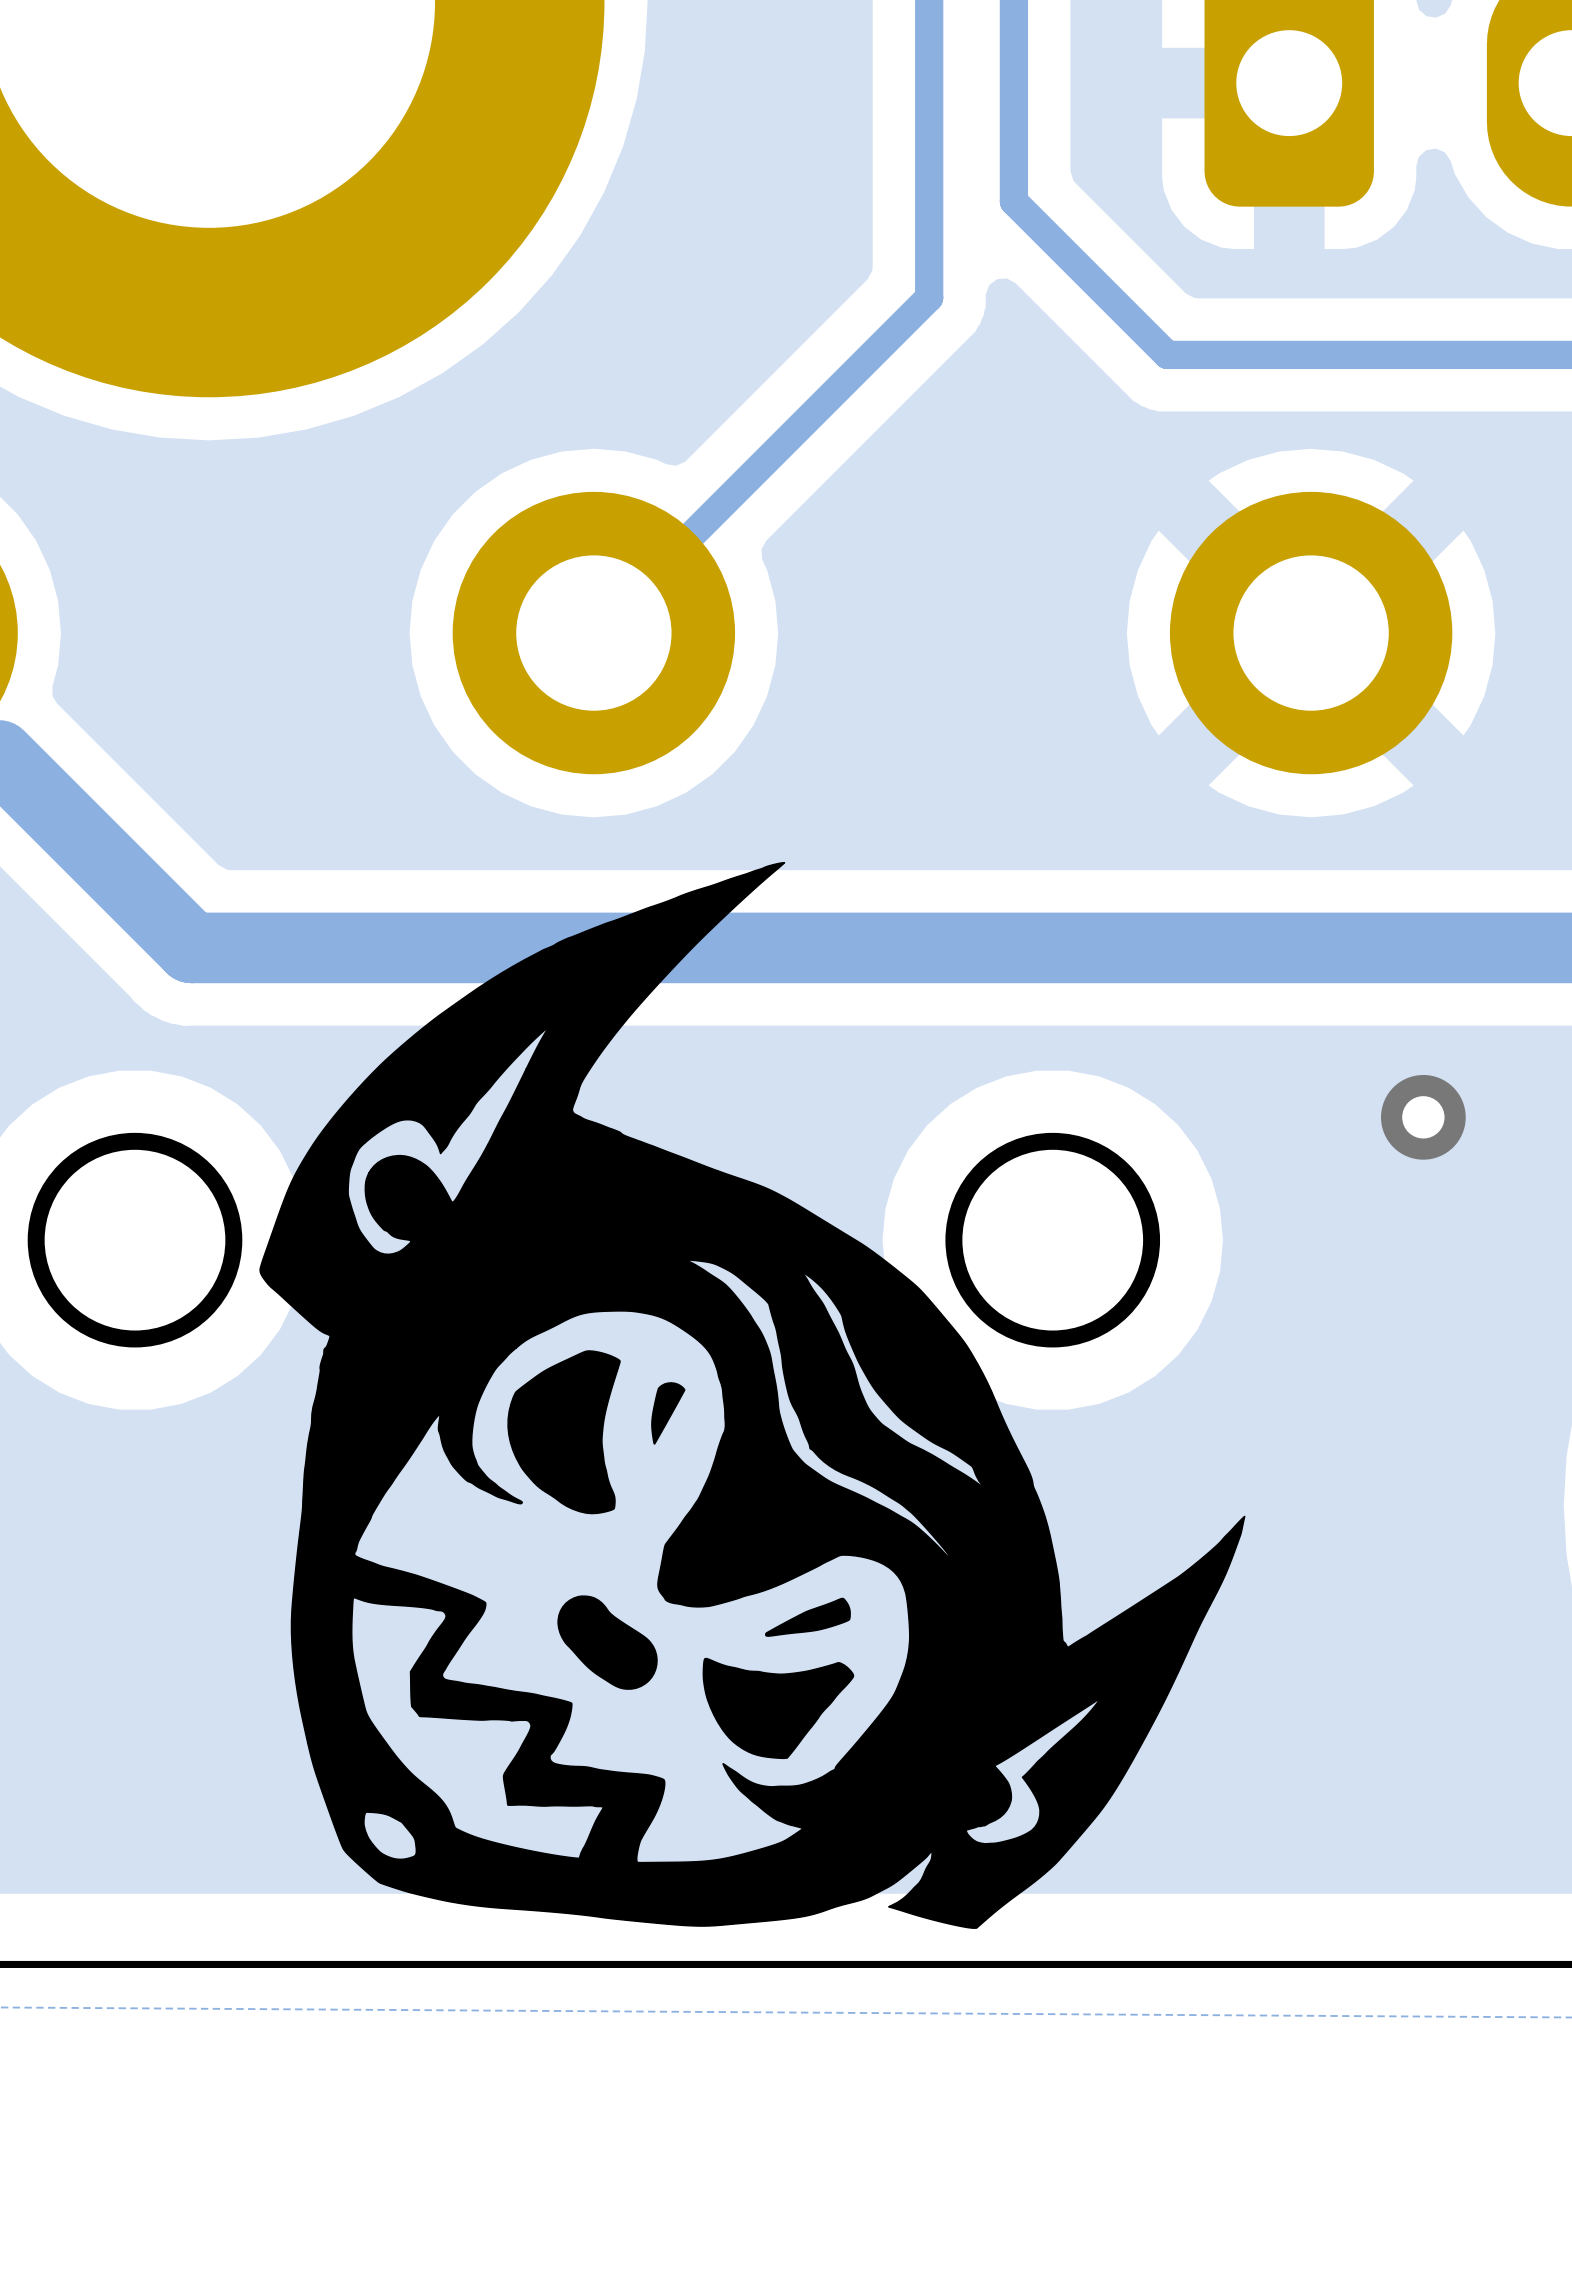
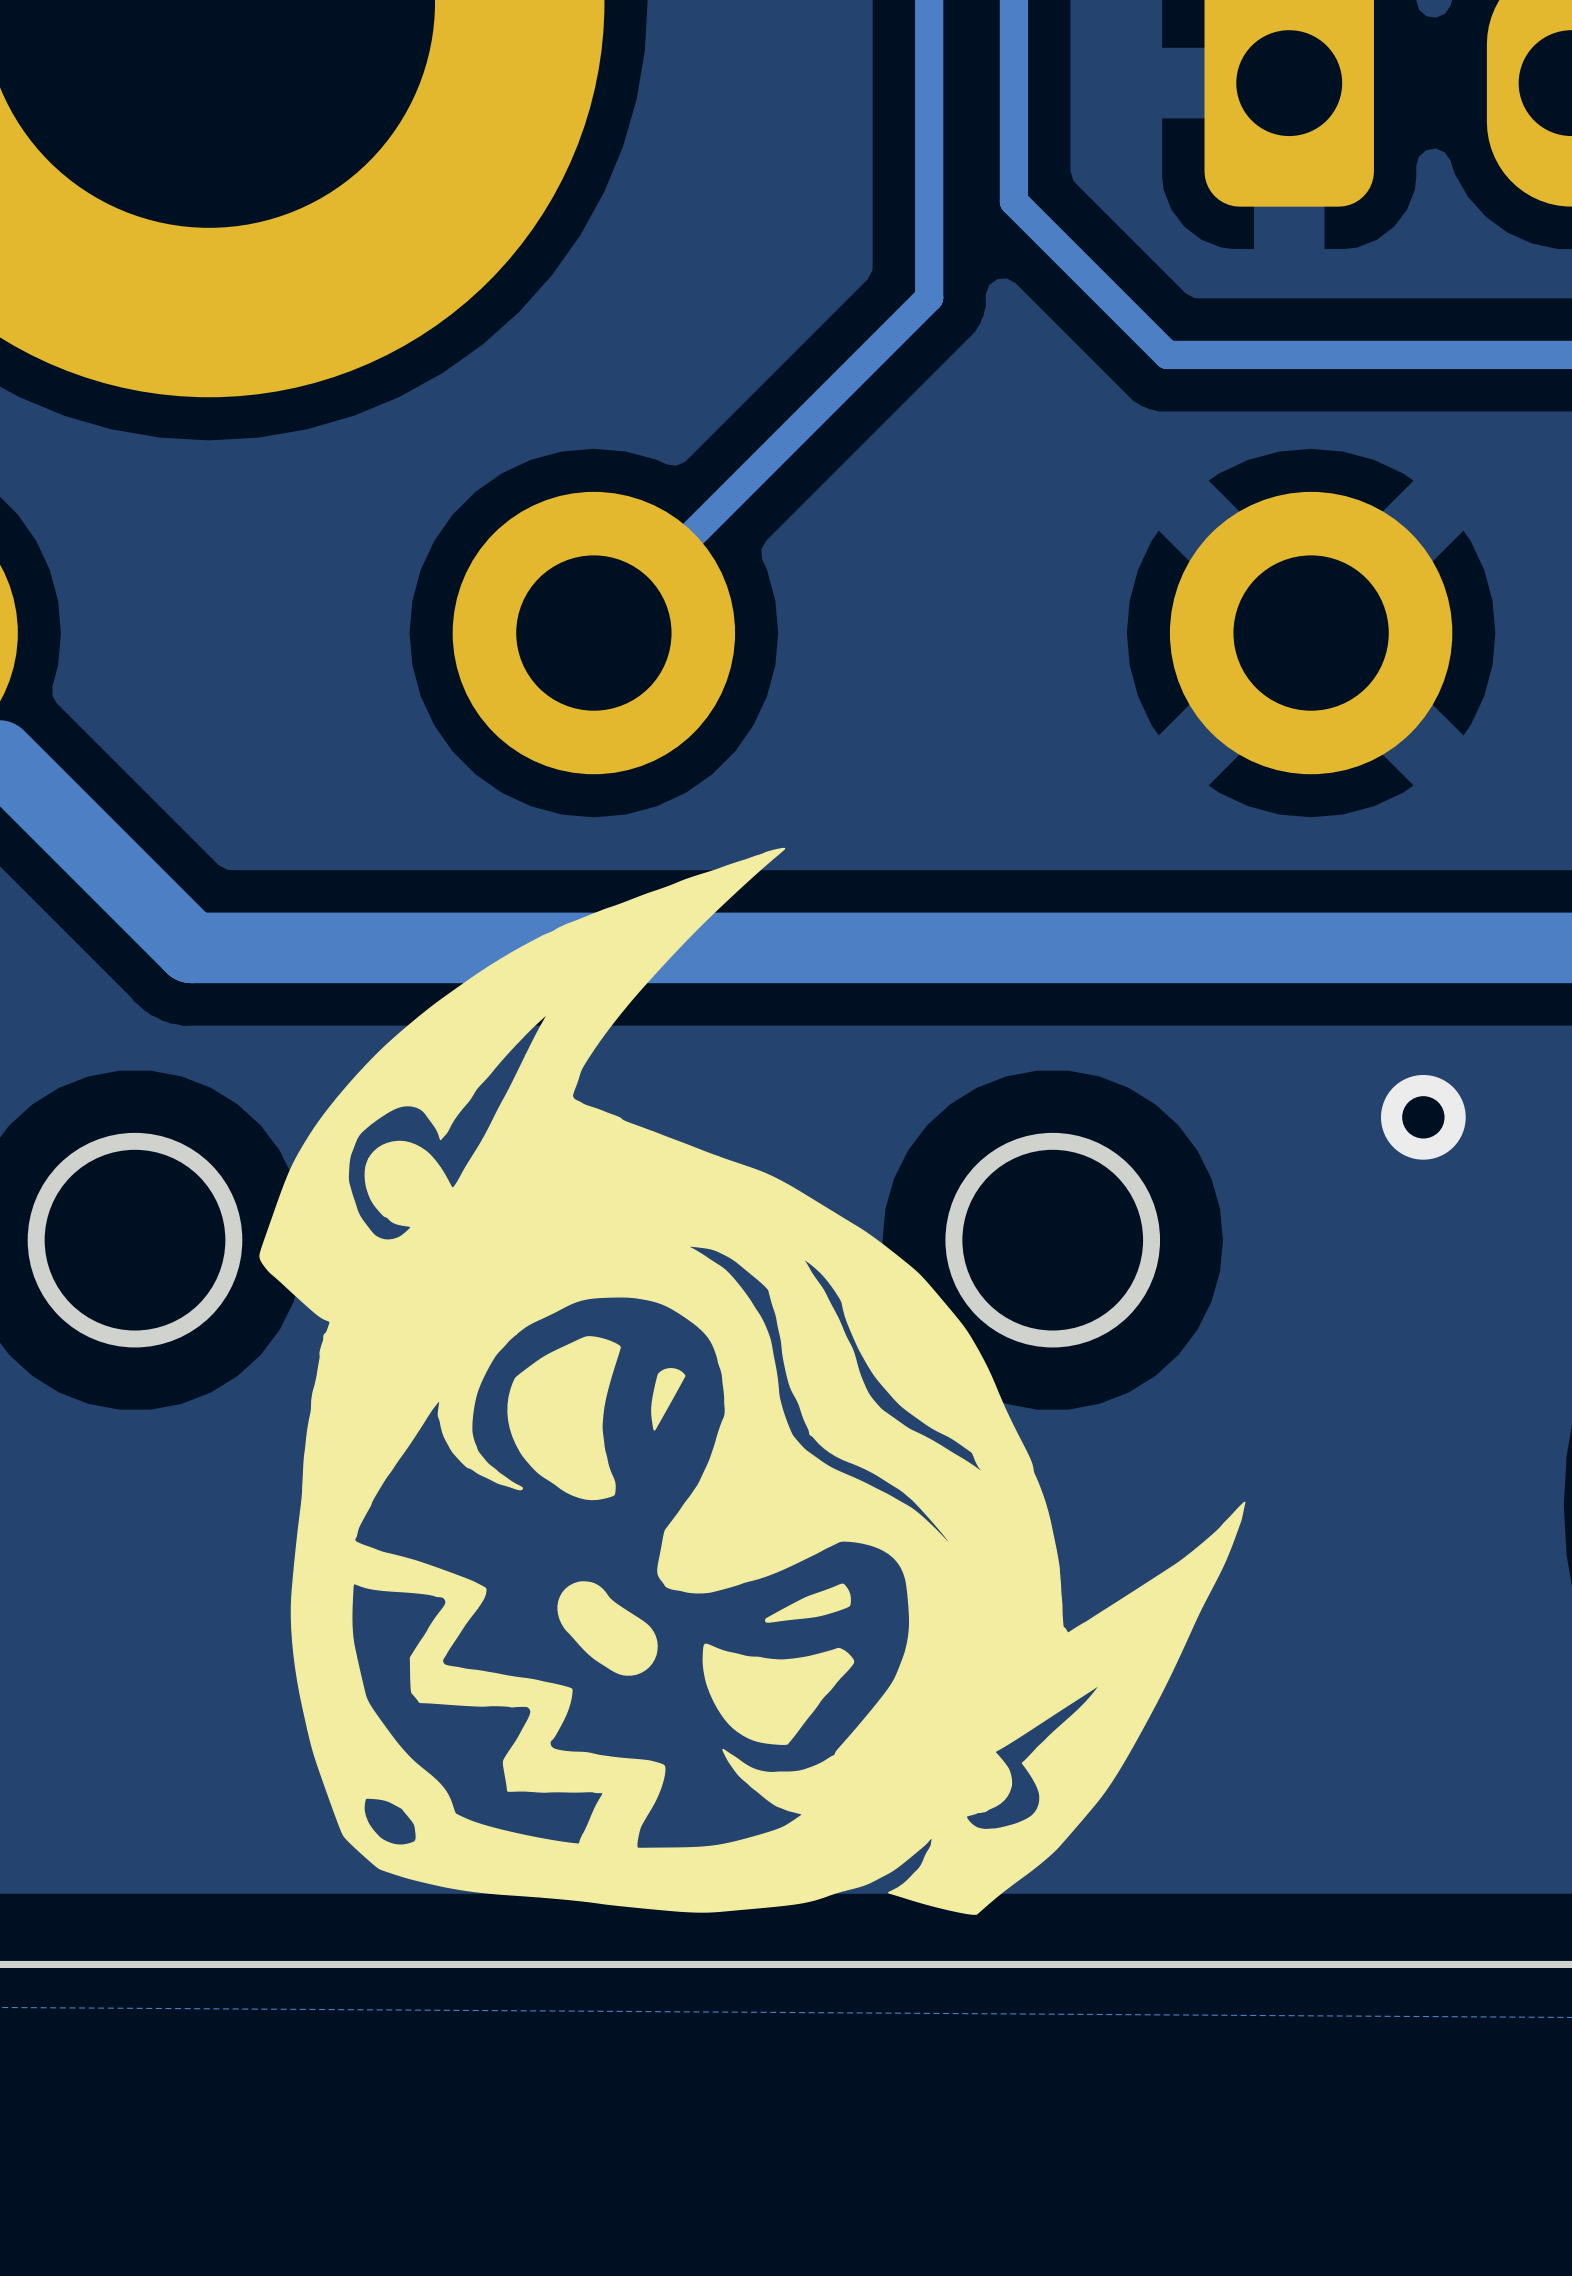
drawing position: (752, 1395) -> (752, 1381)

